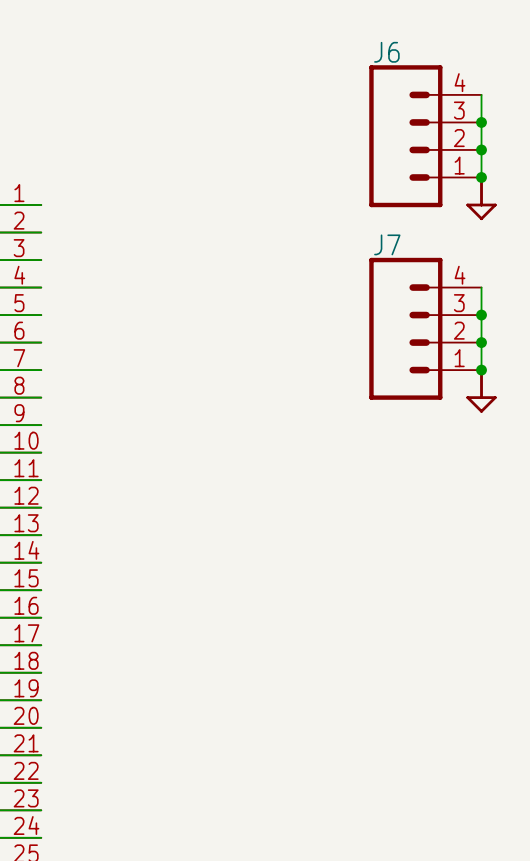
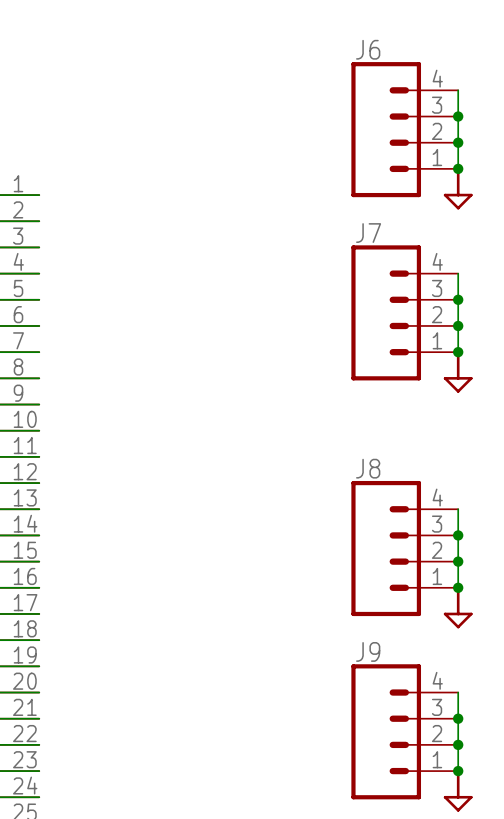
wire: none -> (458, 509) (458, 587)
junction: none -> (458, 535)
J8: none -> (404, 548)
junction: none -> (458, 561)
junction: none -> (458, 587)
power symbol: none -> (458, 607)
wire: none -> (458, 692) (458, 771)
junction: none -> (458, 718)
J9: none -> (404, 731)
junction: none -> (458, 744)
junction: none -> (458, 771)
power symbol: none -> (458, 790)

